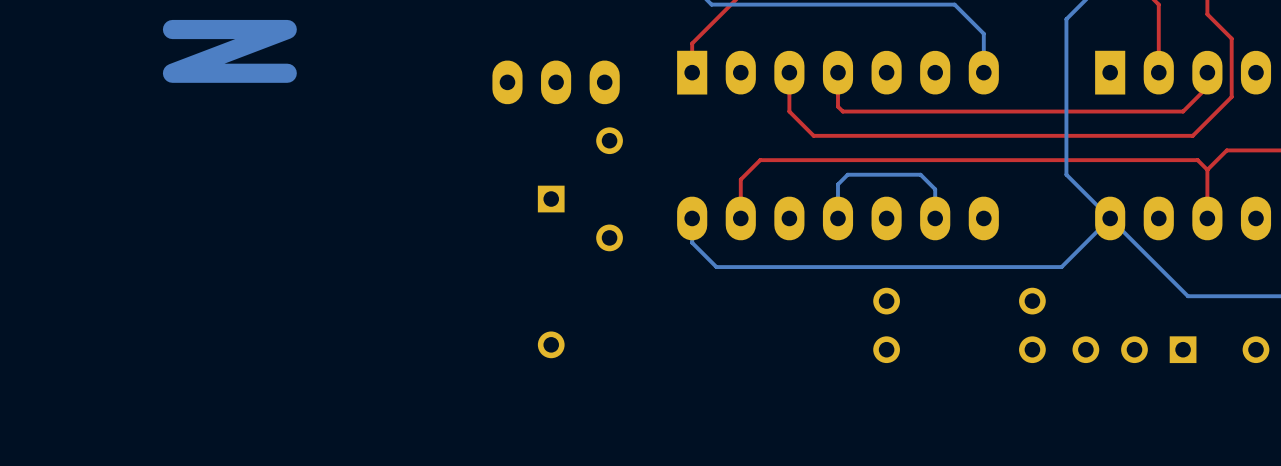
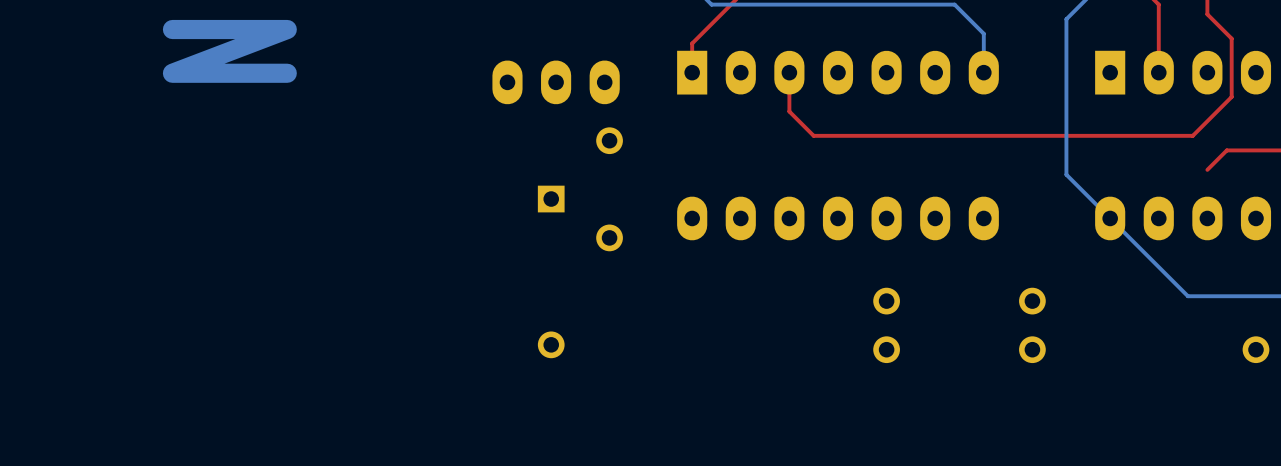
top track: (1207, 72) (1207, 87) (1183, 111) (842, 111) (837, 106) (837, 72) -> none
bottom track: (935, 218) (935, 189) (920, 174) (847, 174) (837, 184) (837, 218) -> none
bottom track: (1110, 218) (1061, 267) (716, 267) (692, 242) (692, 218) -> none
top track: (1207, 218) (1207, 169) (1197, 160) (760, 160) (740, 179) (740, 218) -> none
part: (1134, 349) -> none

